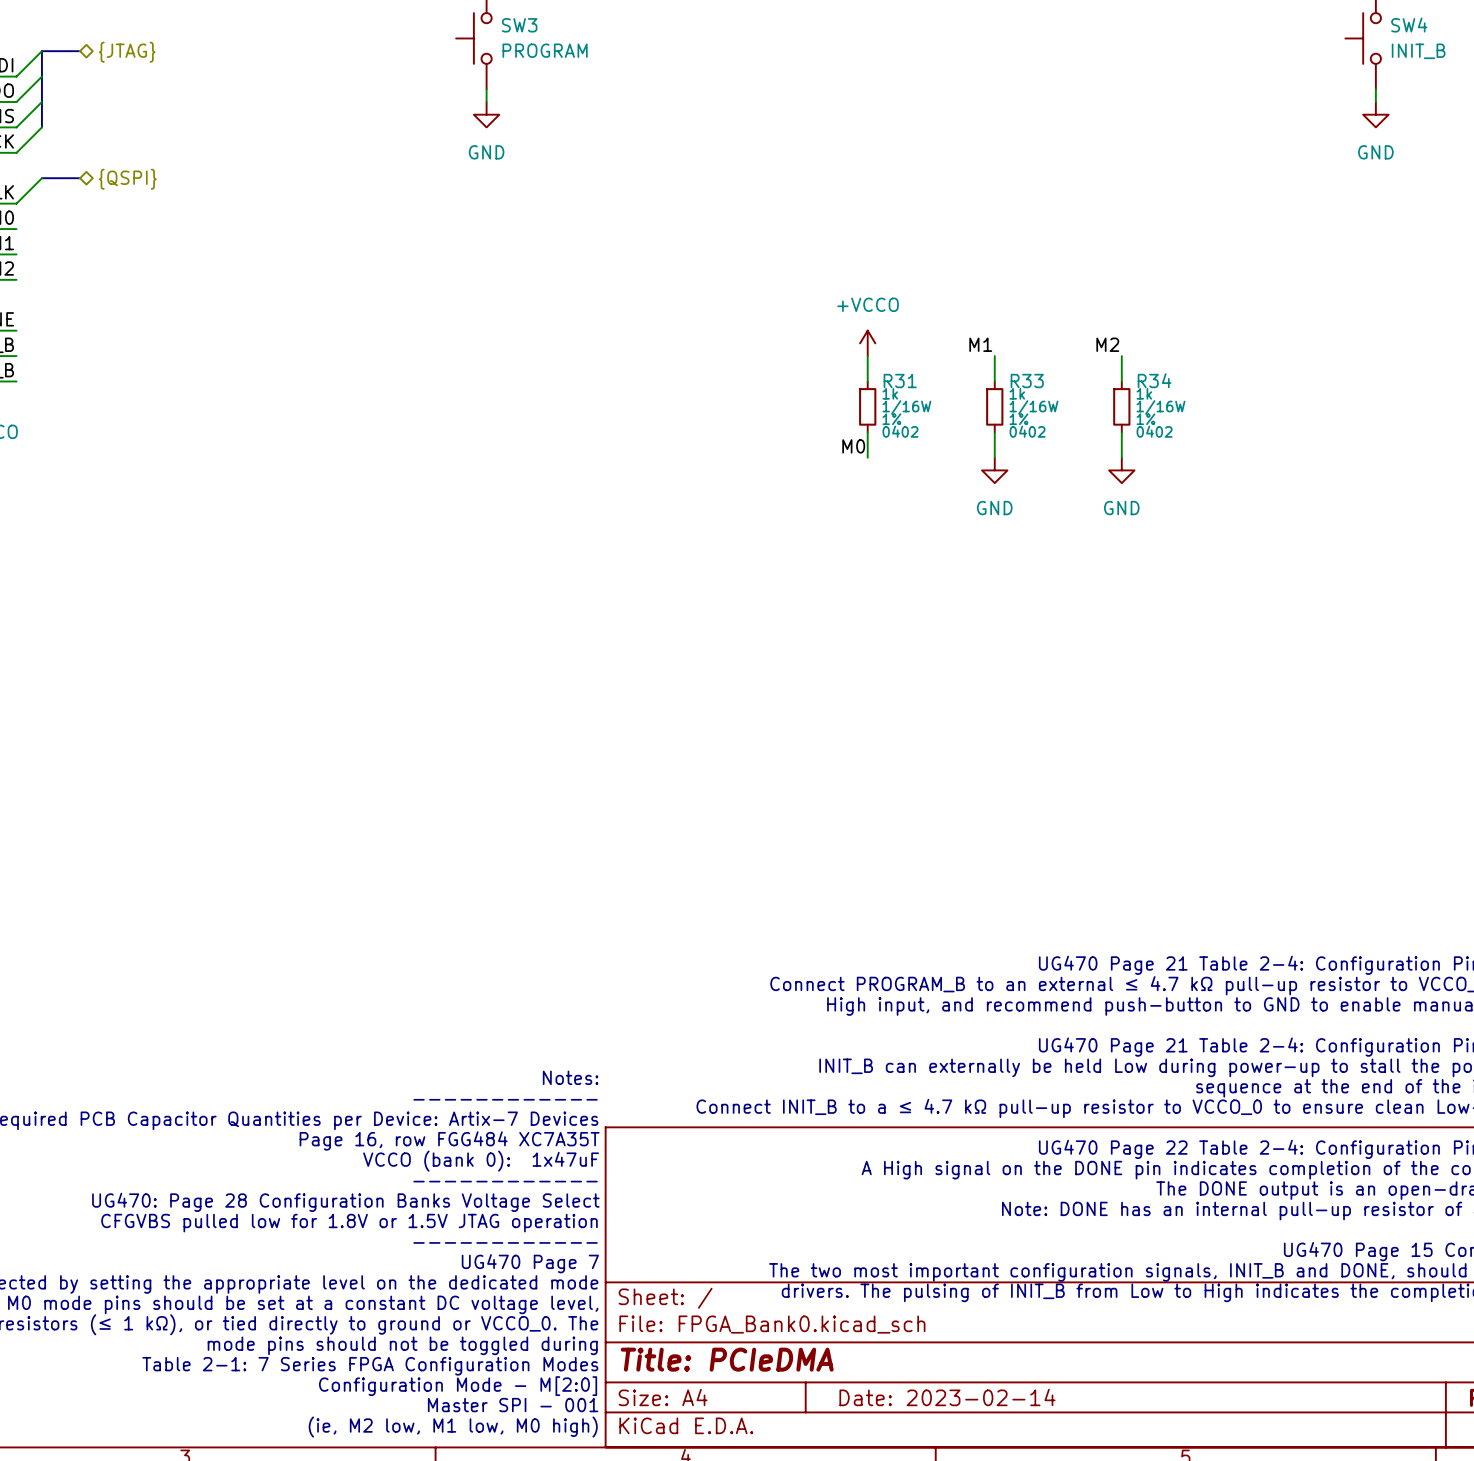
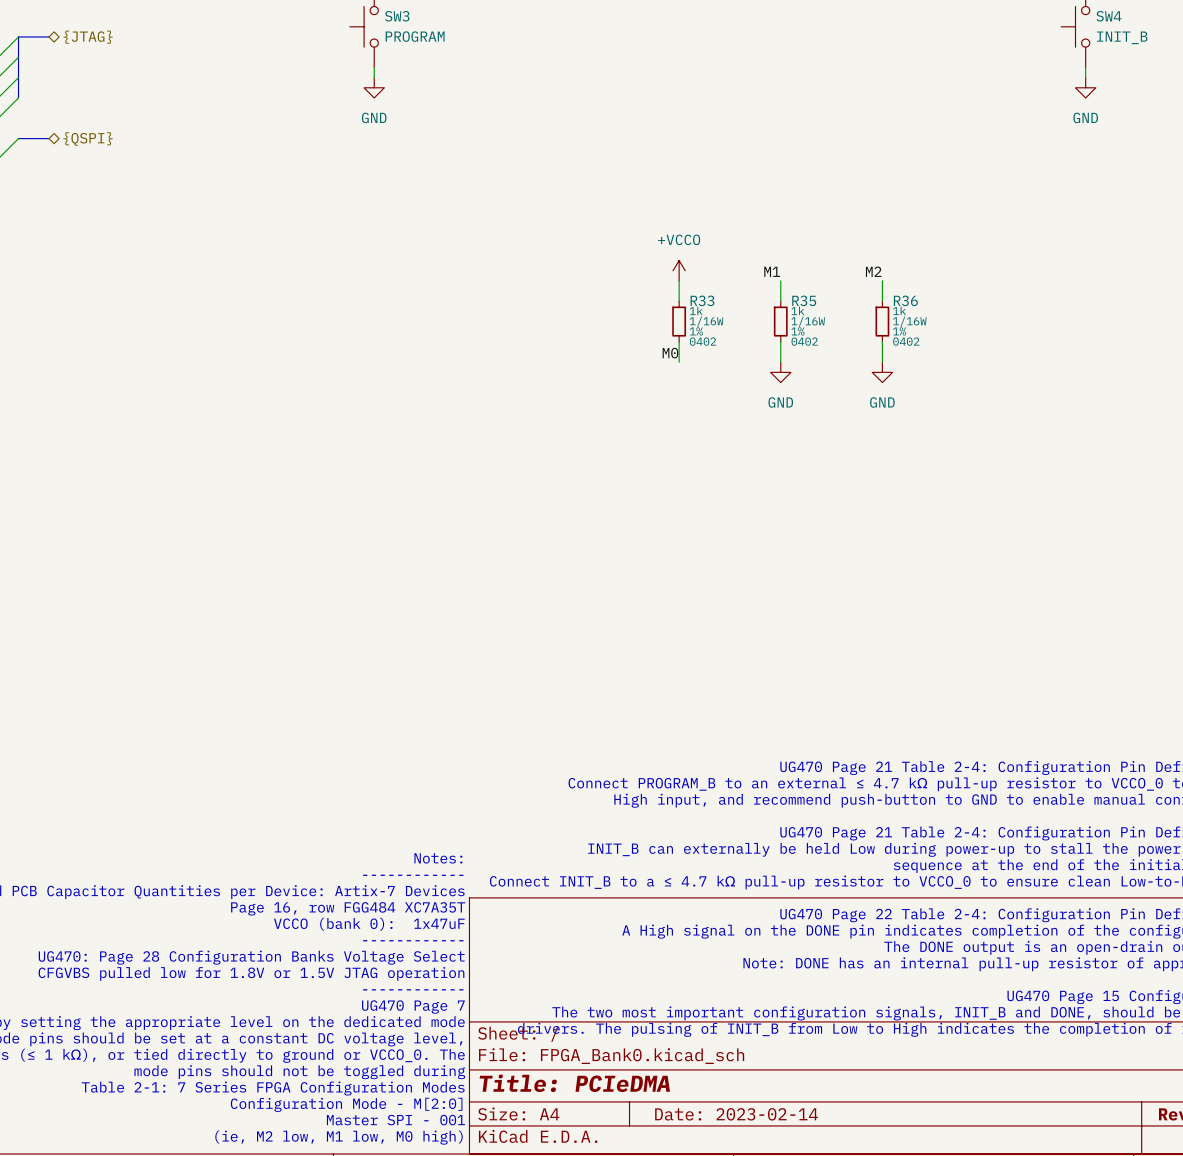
R34 name: R34 (1154, 380) -> R36 (905, 300)
R31 name: R31 (900, 381) -> R33 (702, 300)
R33 name: R33 (1027, 381) -> R35 (804, 300)

